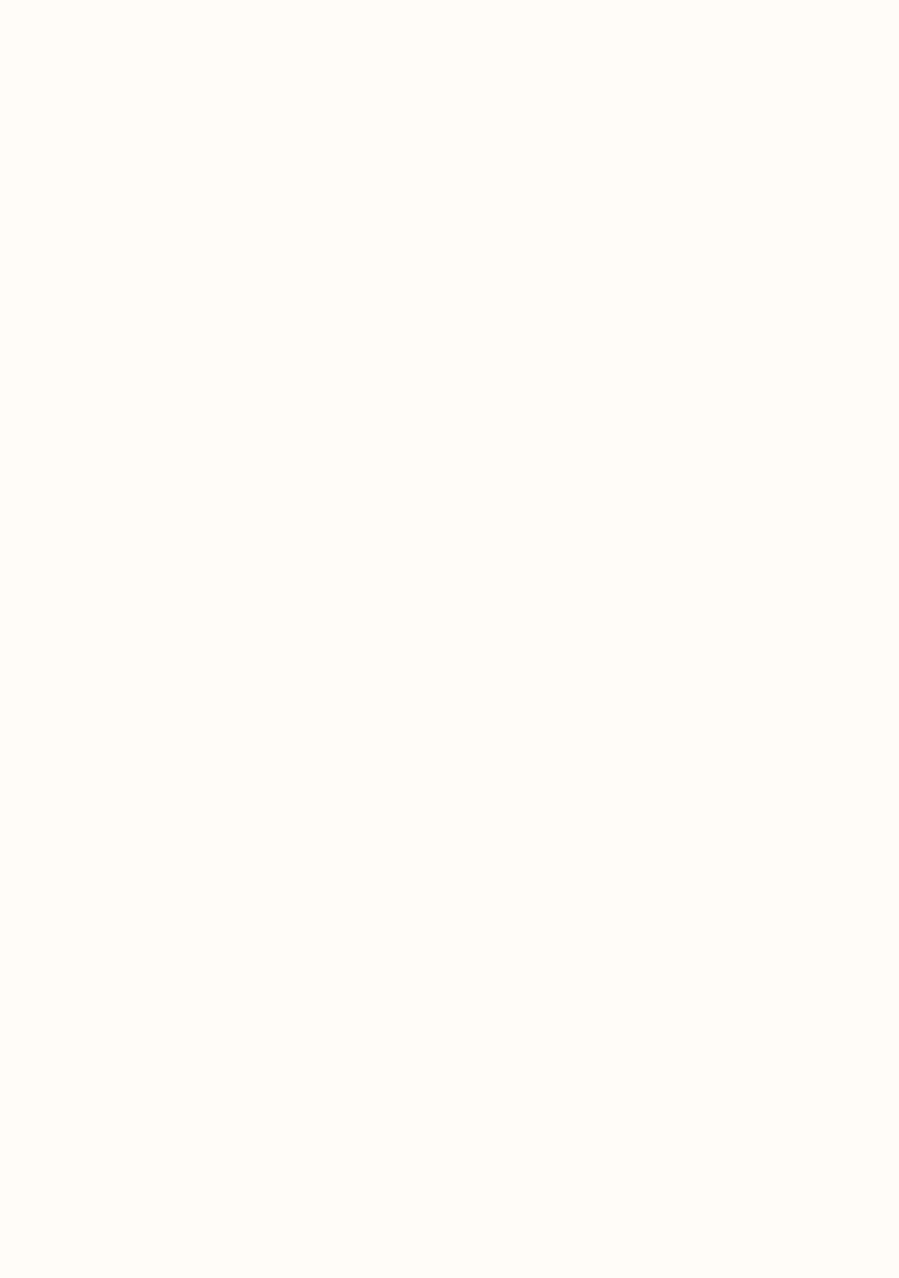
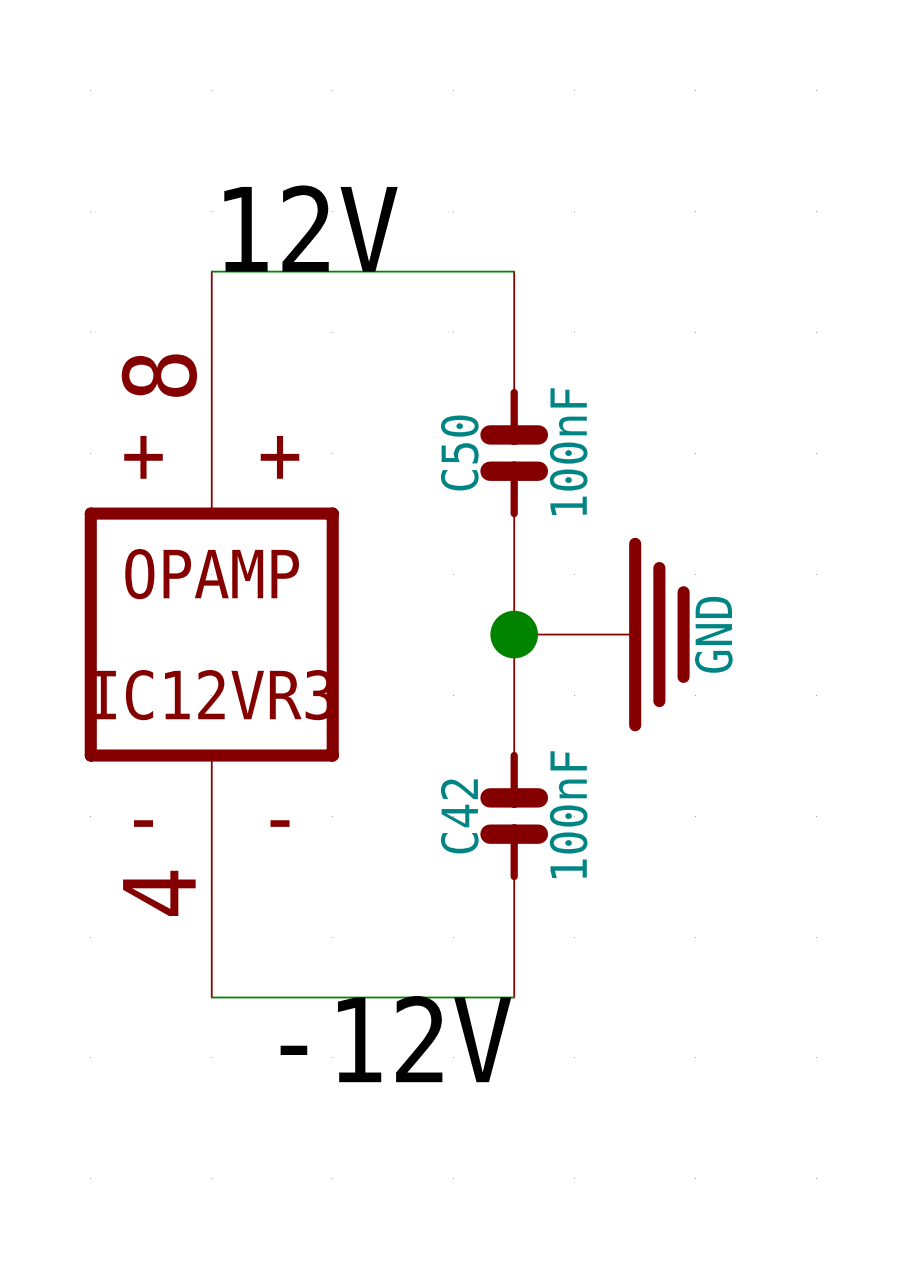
label: none -> 12V (310, 228)
wire: none -> (211, 271) (514, 271)
C50: none -> 100nF (514, 453)
IC12VR3: none -> (211, 634)
junction: none -> (514, 634)
power symbol: none -> GND (601, 634)
C42: none -> 100nF (514, 816)
wire: none -> (211, 997) (514, 997)
label: none -> -12V (395, 1039)

